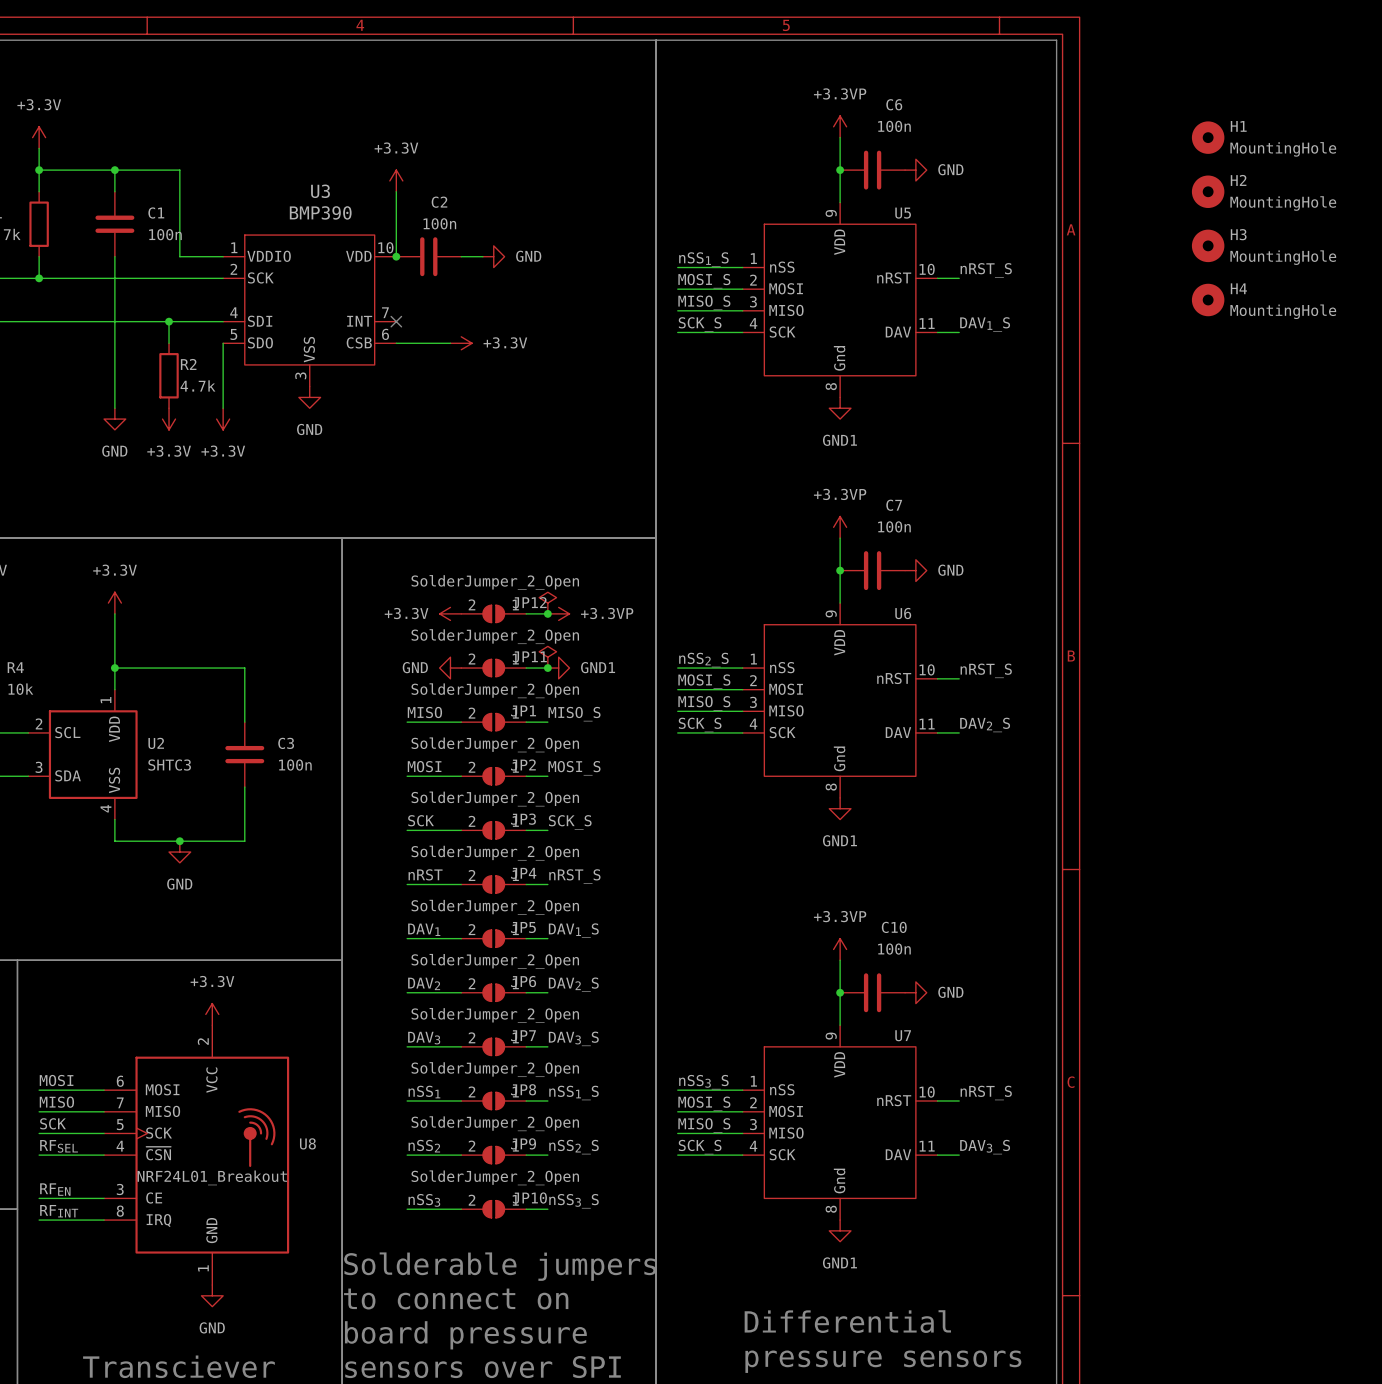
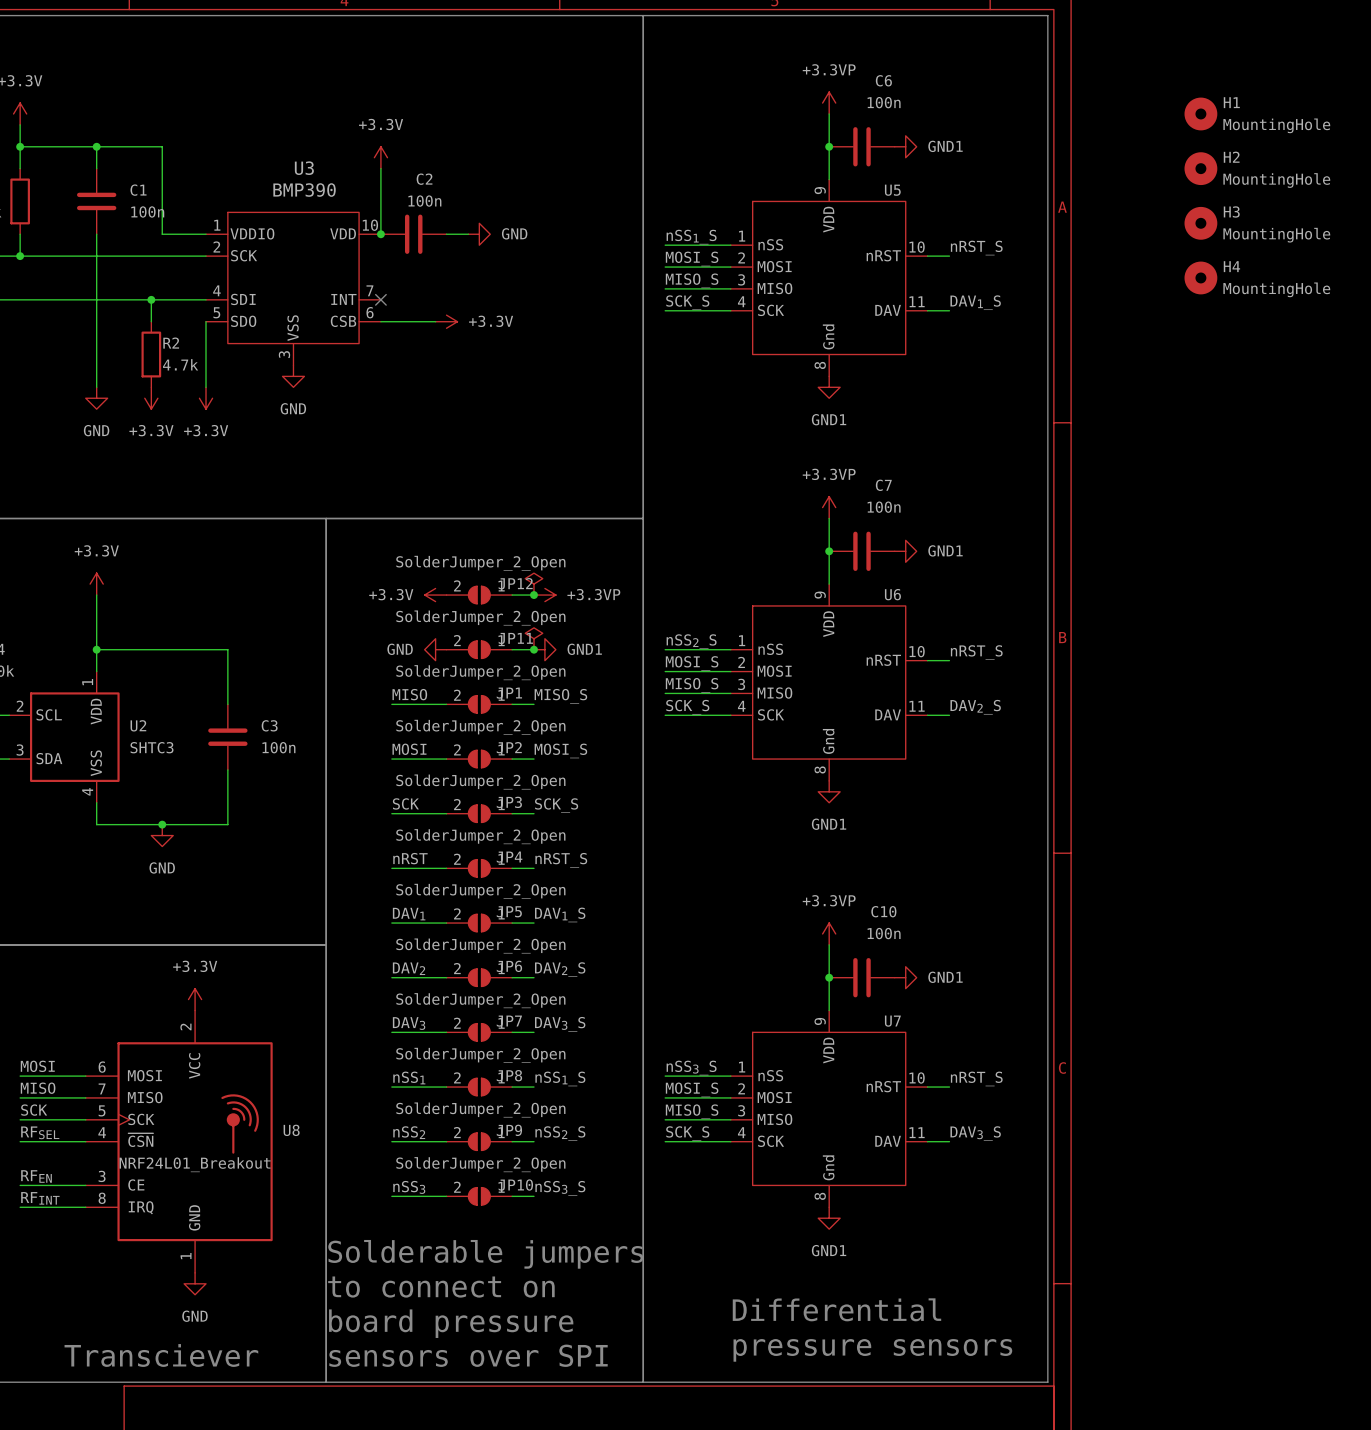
power symbol: GND (915, 170) -> GND1 (905, 146)
power symbol: GND (915, 570) -> GND1 (905, 551)
power symbol: GND (915, 992) -> GND1 (905, 977)

